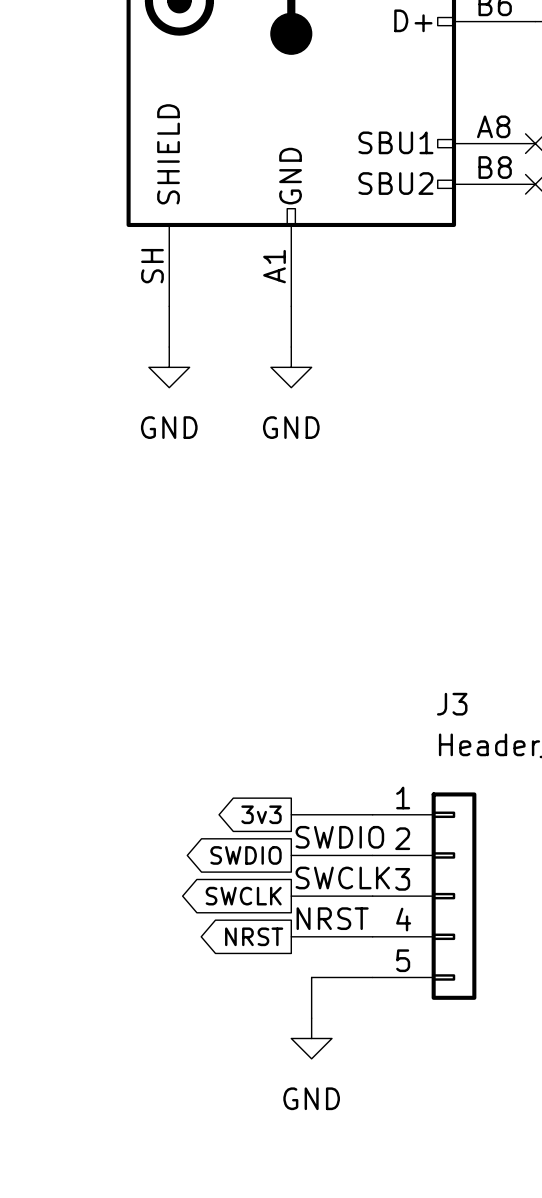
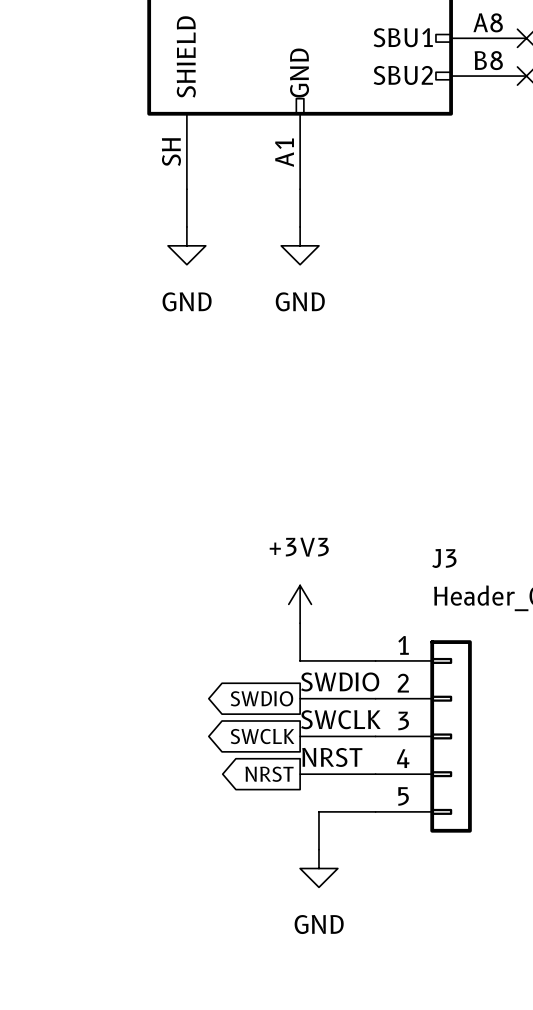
power symbol: none -> +3V3 (300, 604)
wire: none -> (300, 623) (300, 660)
global label: 3v3 (261, 814) -> none

